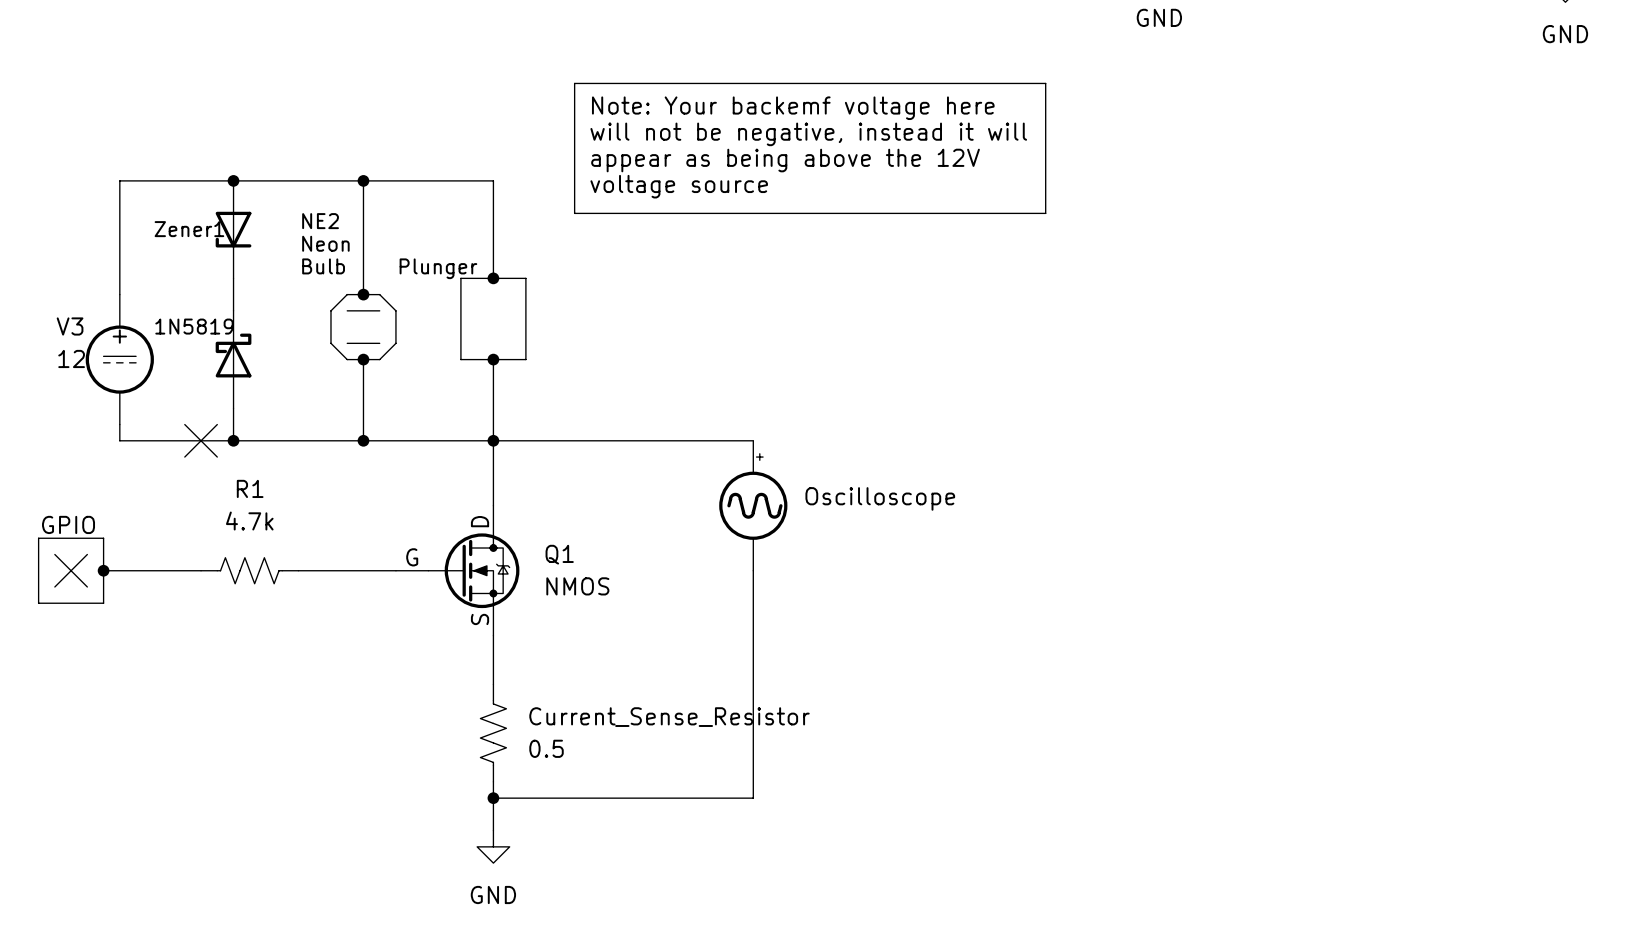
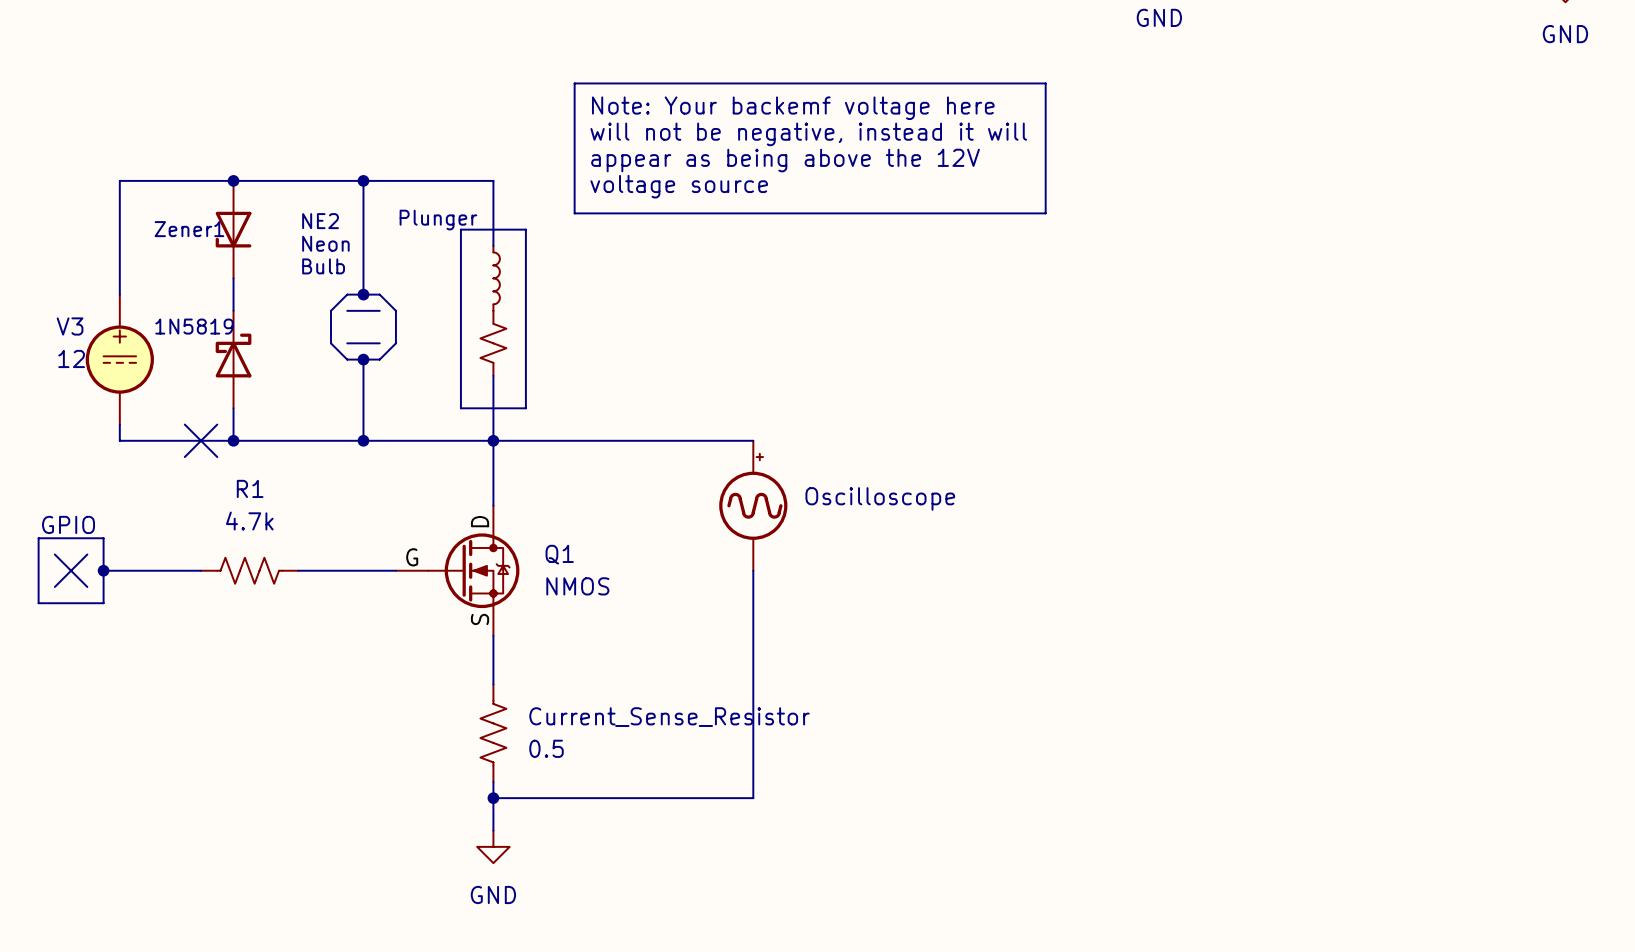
line: none -> (460, 229) (460, 408) (525, 408) (525, 229) (460, 229)
wire: (493, 245) (493, 278) -> none
text position: Plunger (438, 268) -> Plunger (438, 220)
wire: (460, 278) (525, 278) (525, 359) (460, 359) (460, 278) -> none
junction: (493, 278) -> none
part: none -> (496, 278)
part: none -> (493, 343)
junction: (493, 359) -> none

